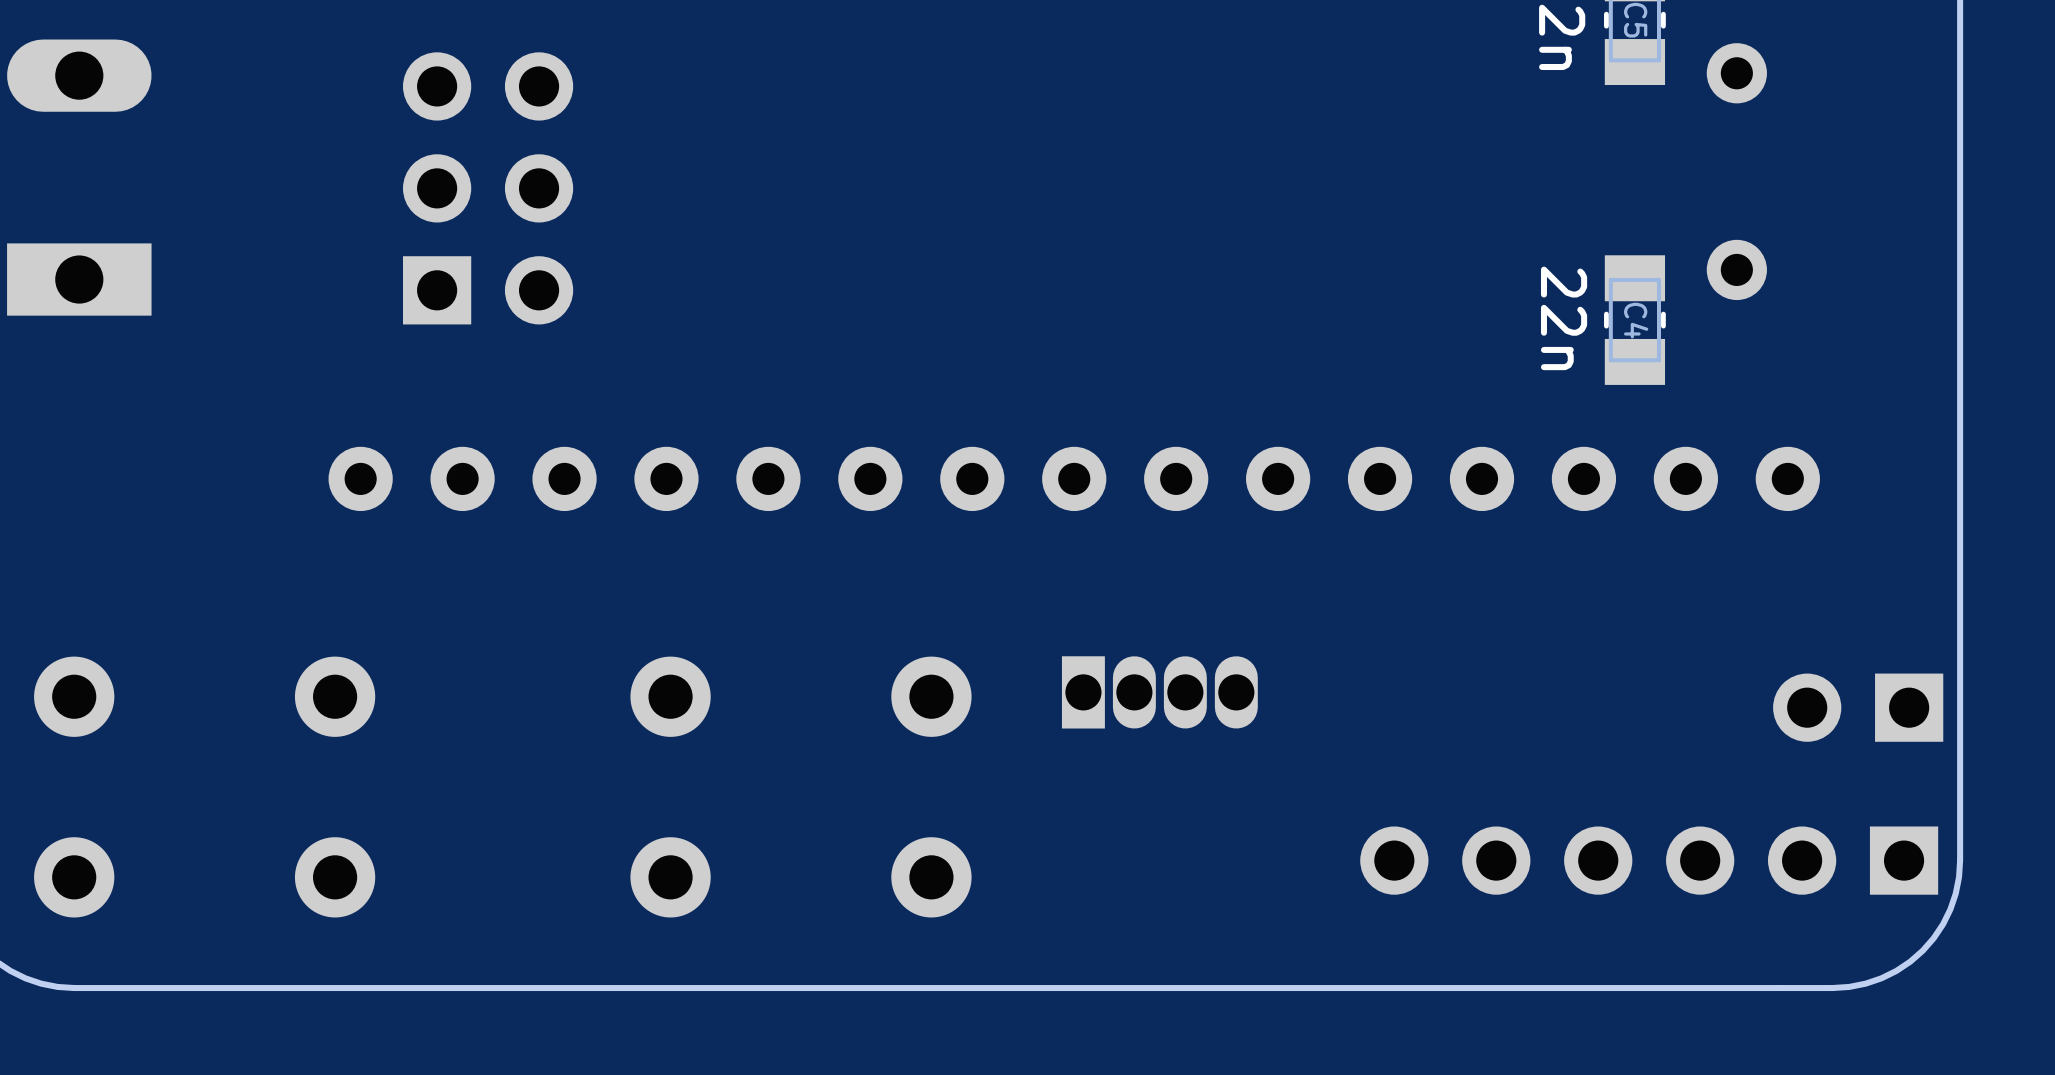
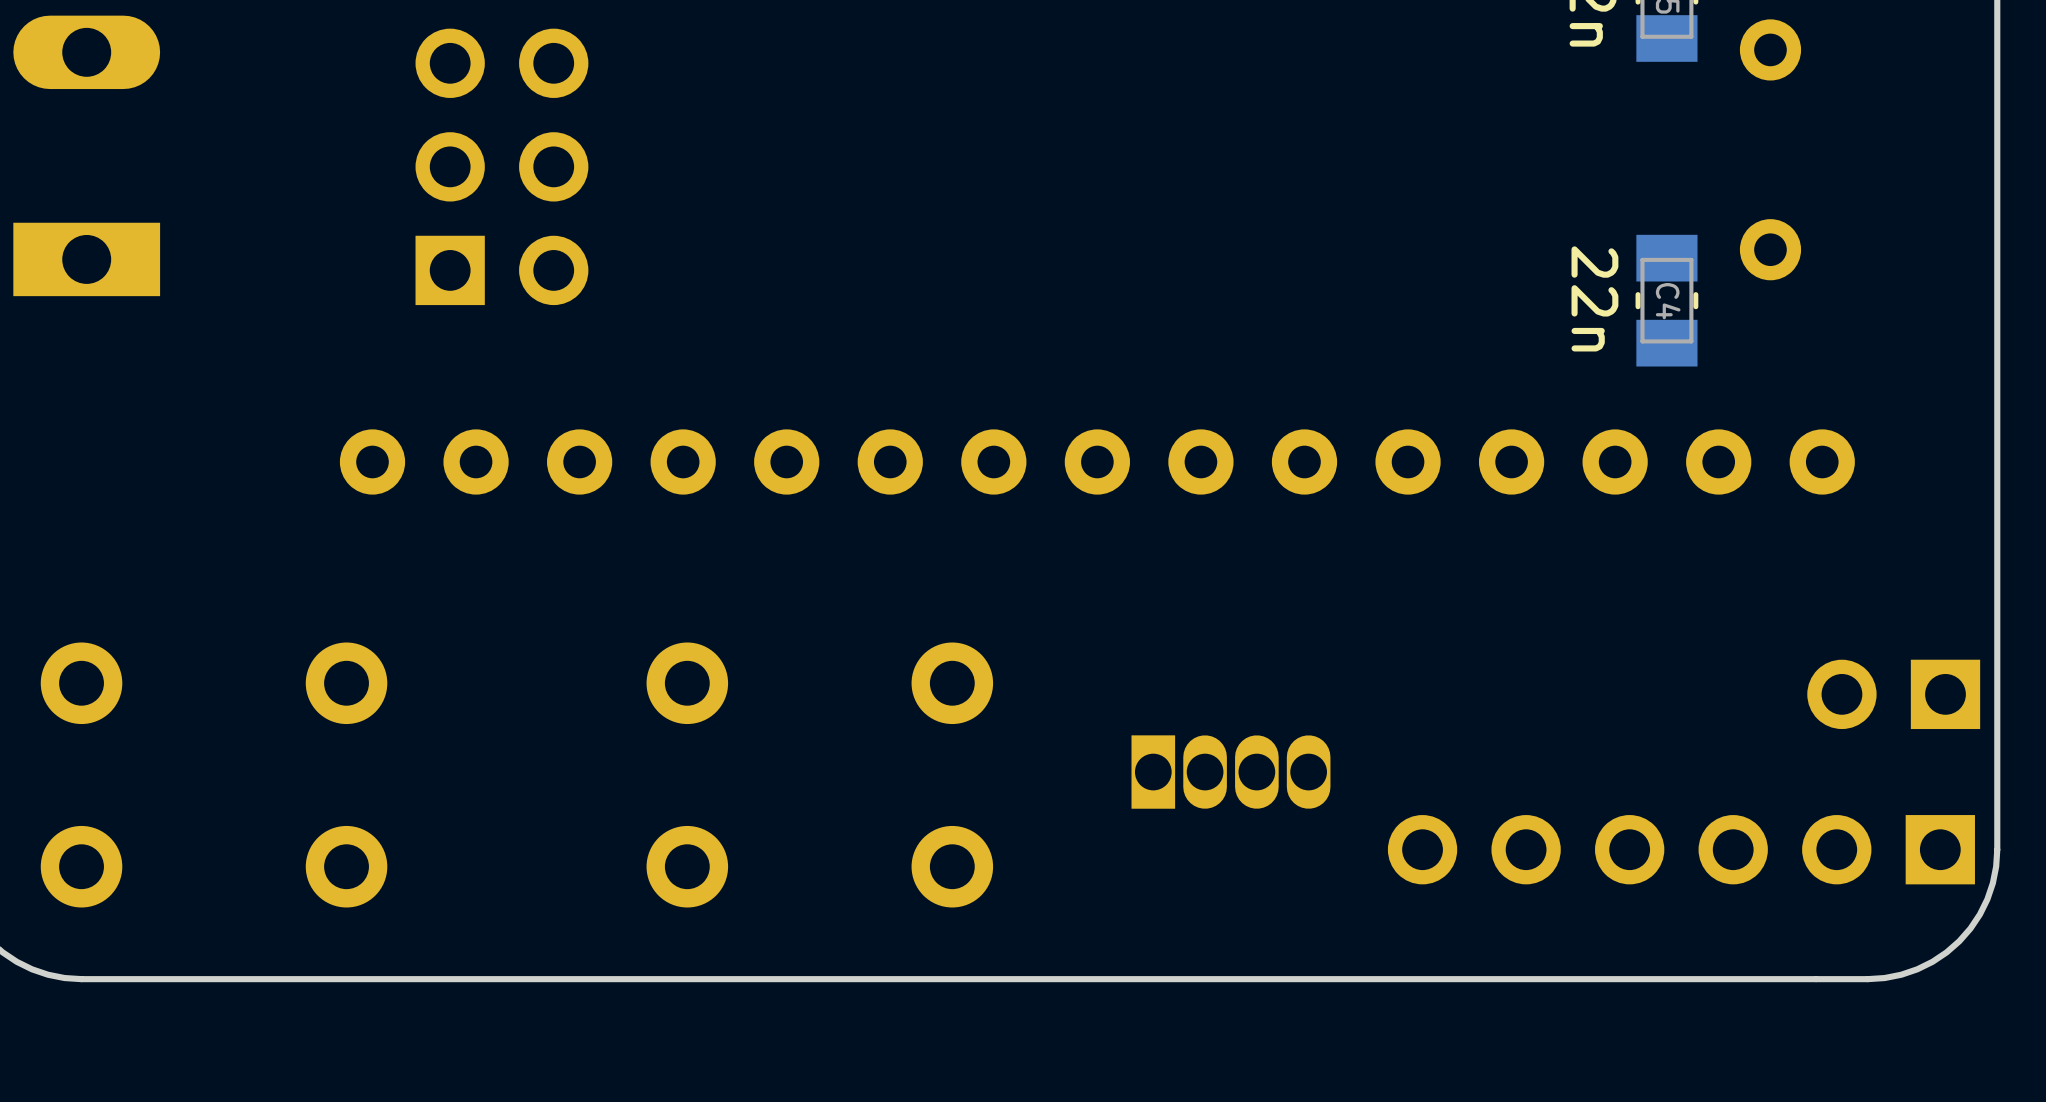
part position: (1159, 692) -> (1230, 772)

